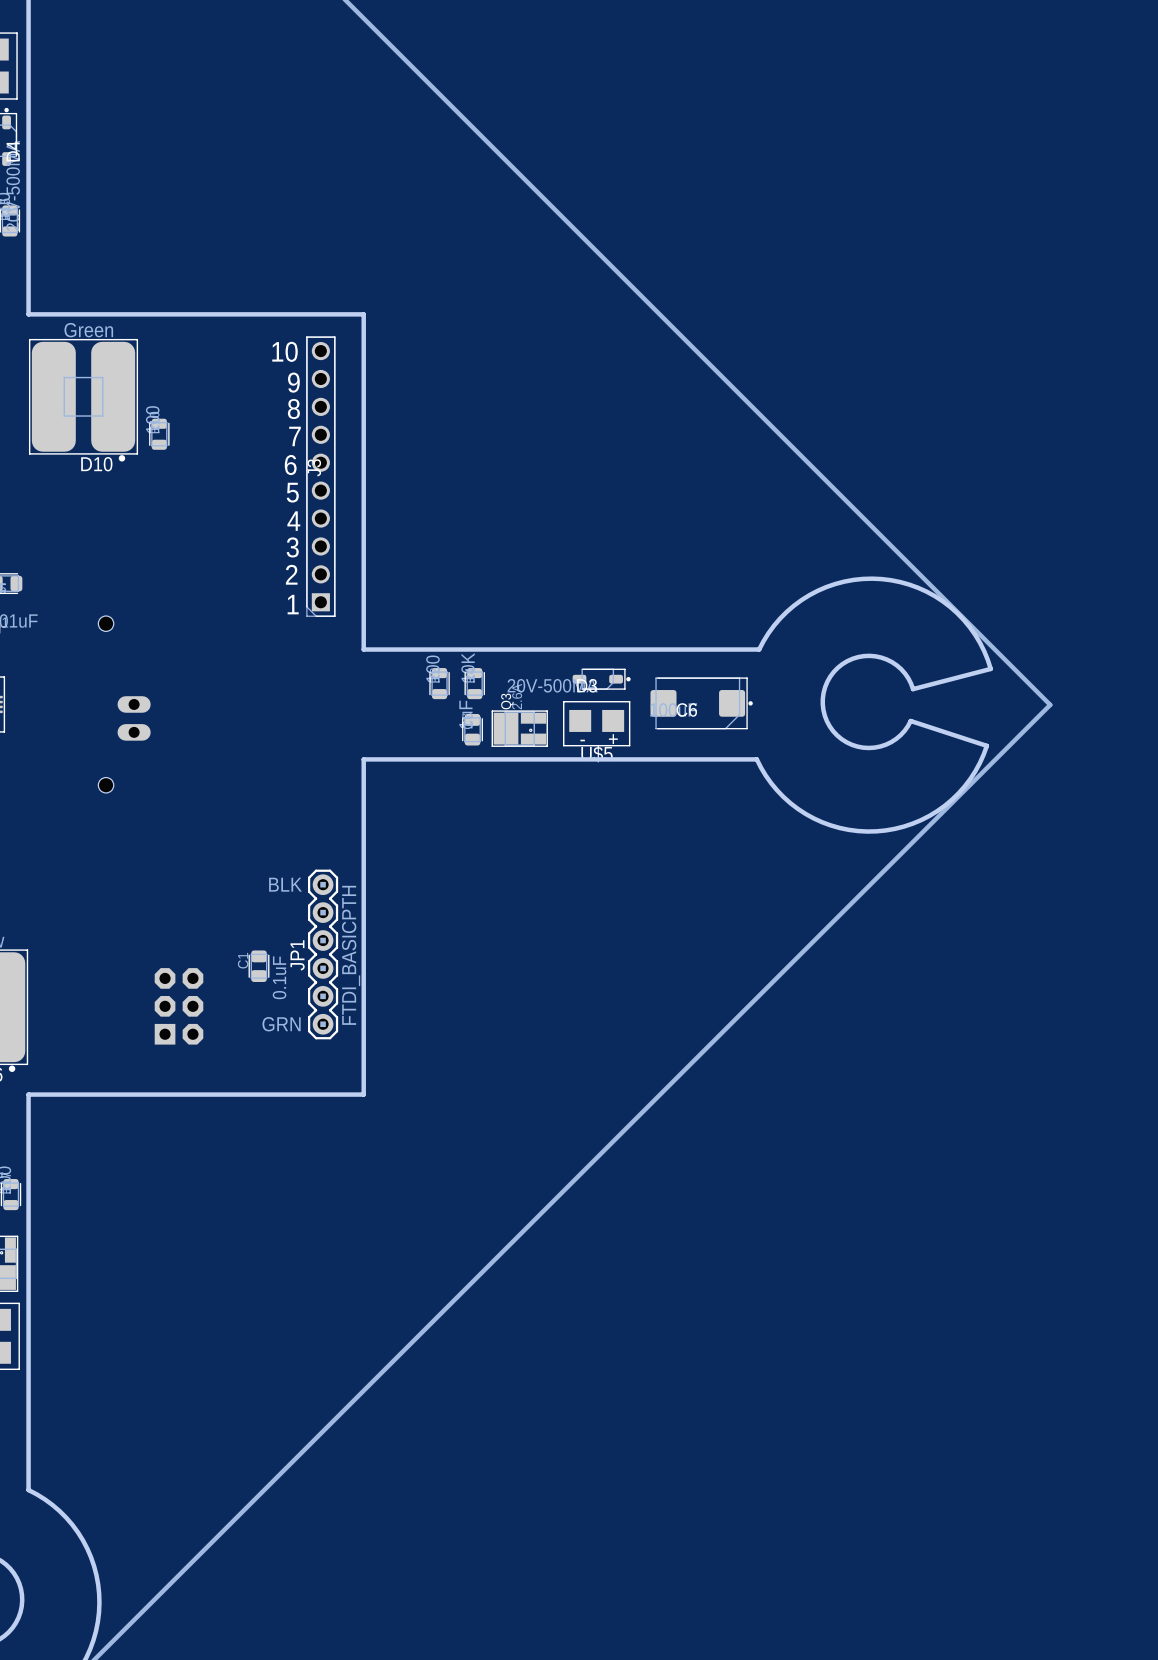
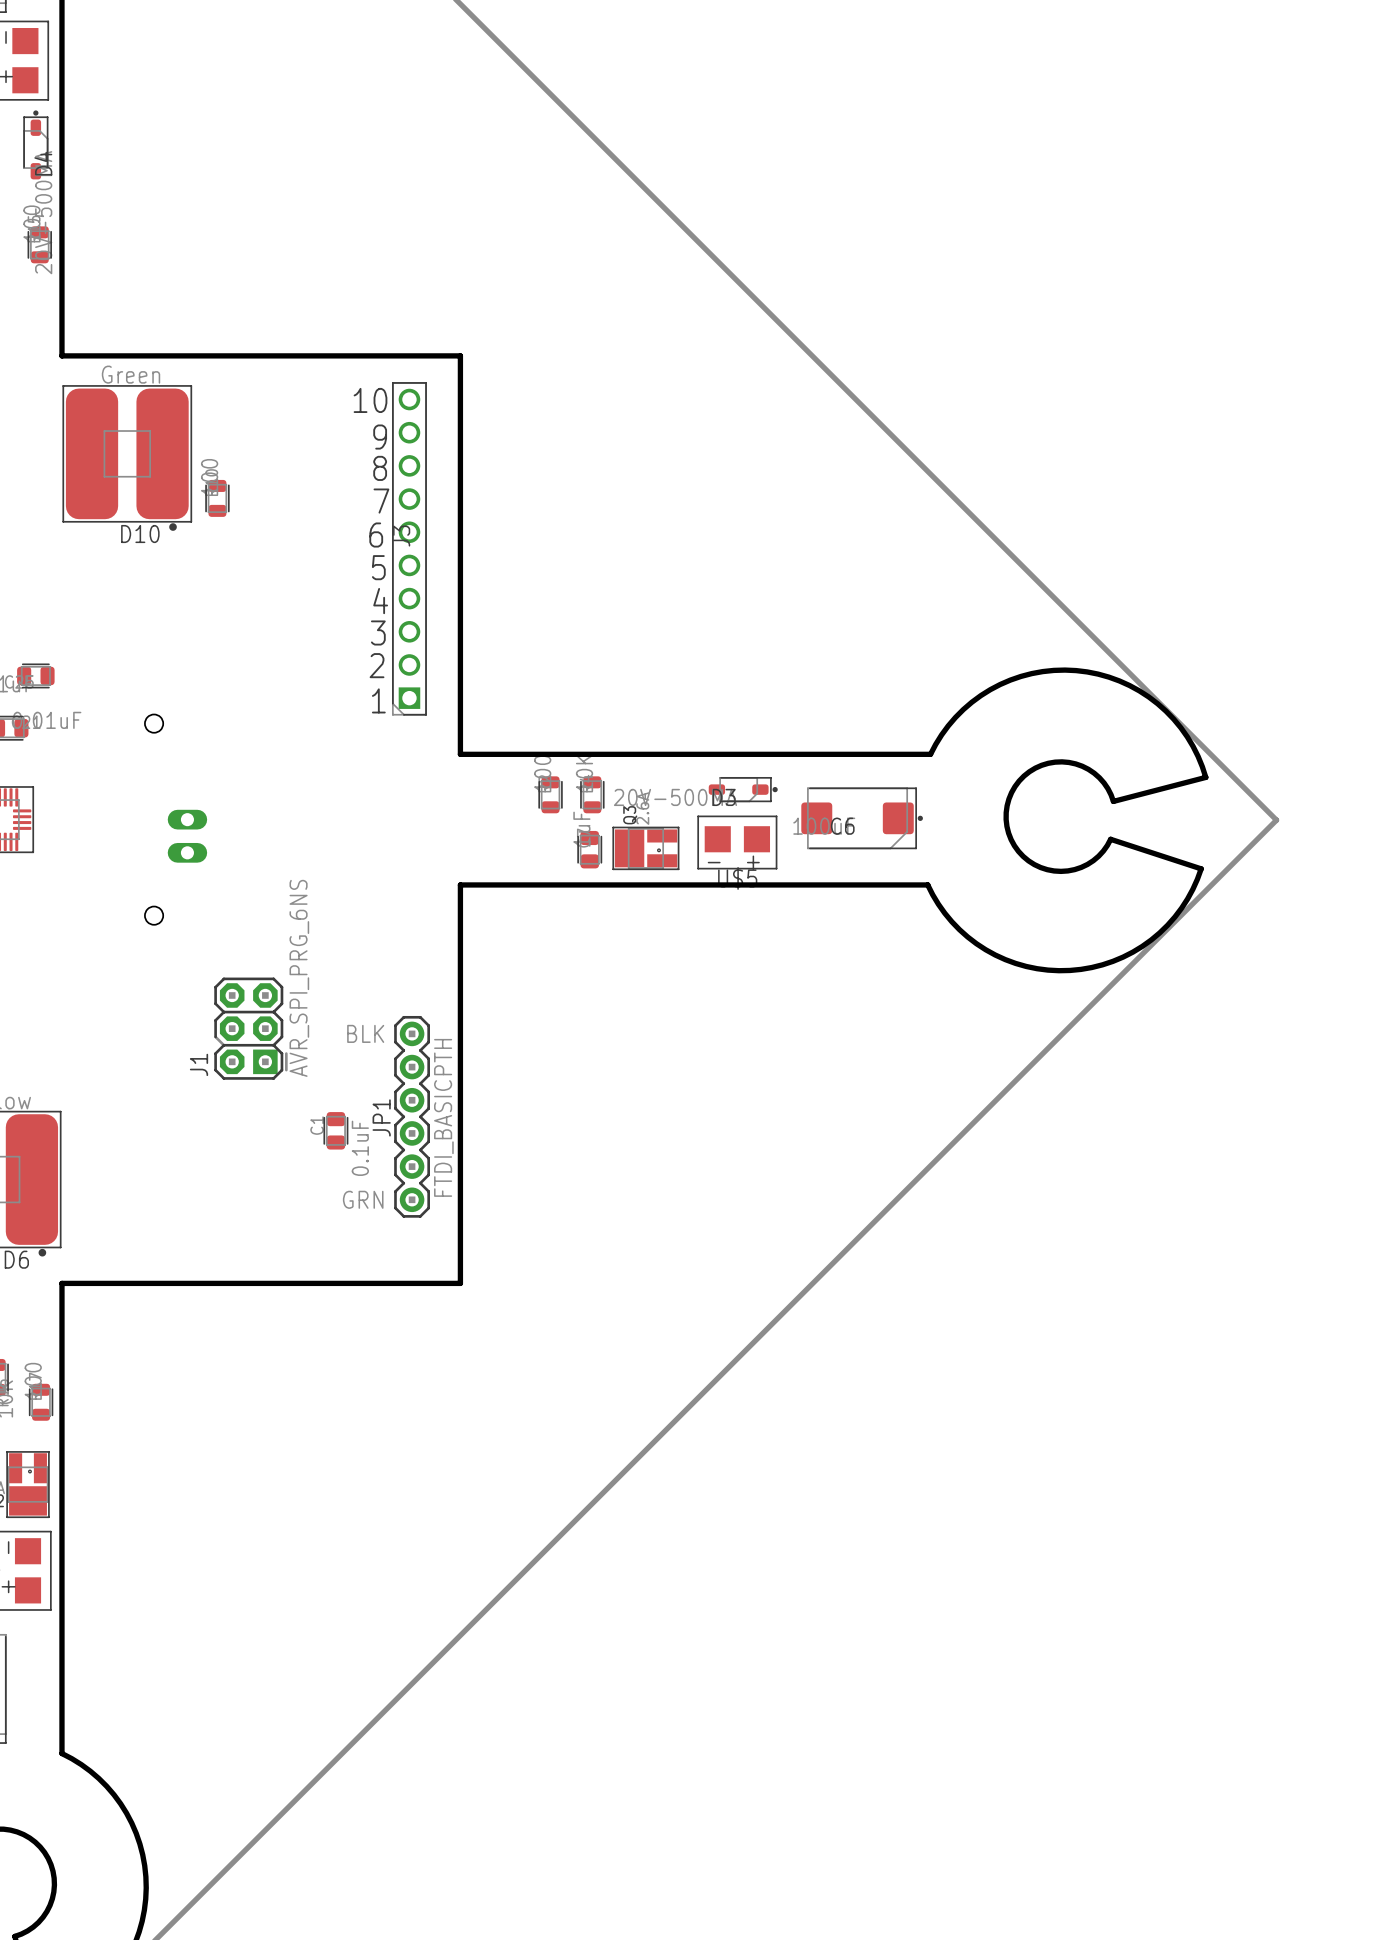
J1 side: bottom (179, 1006) -> top (250, 1028)

